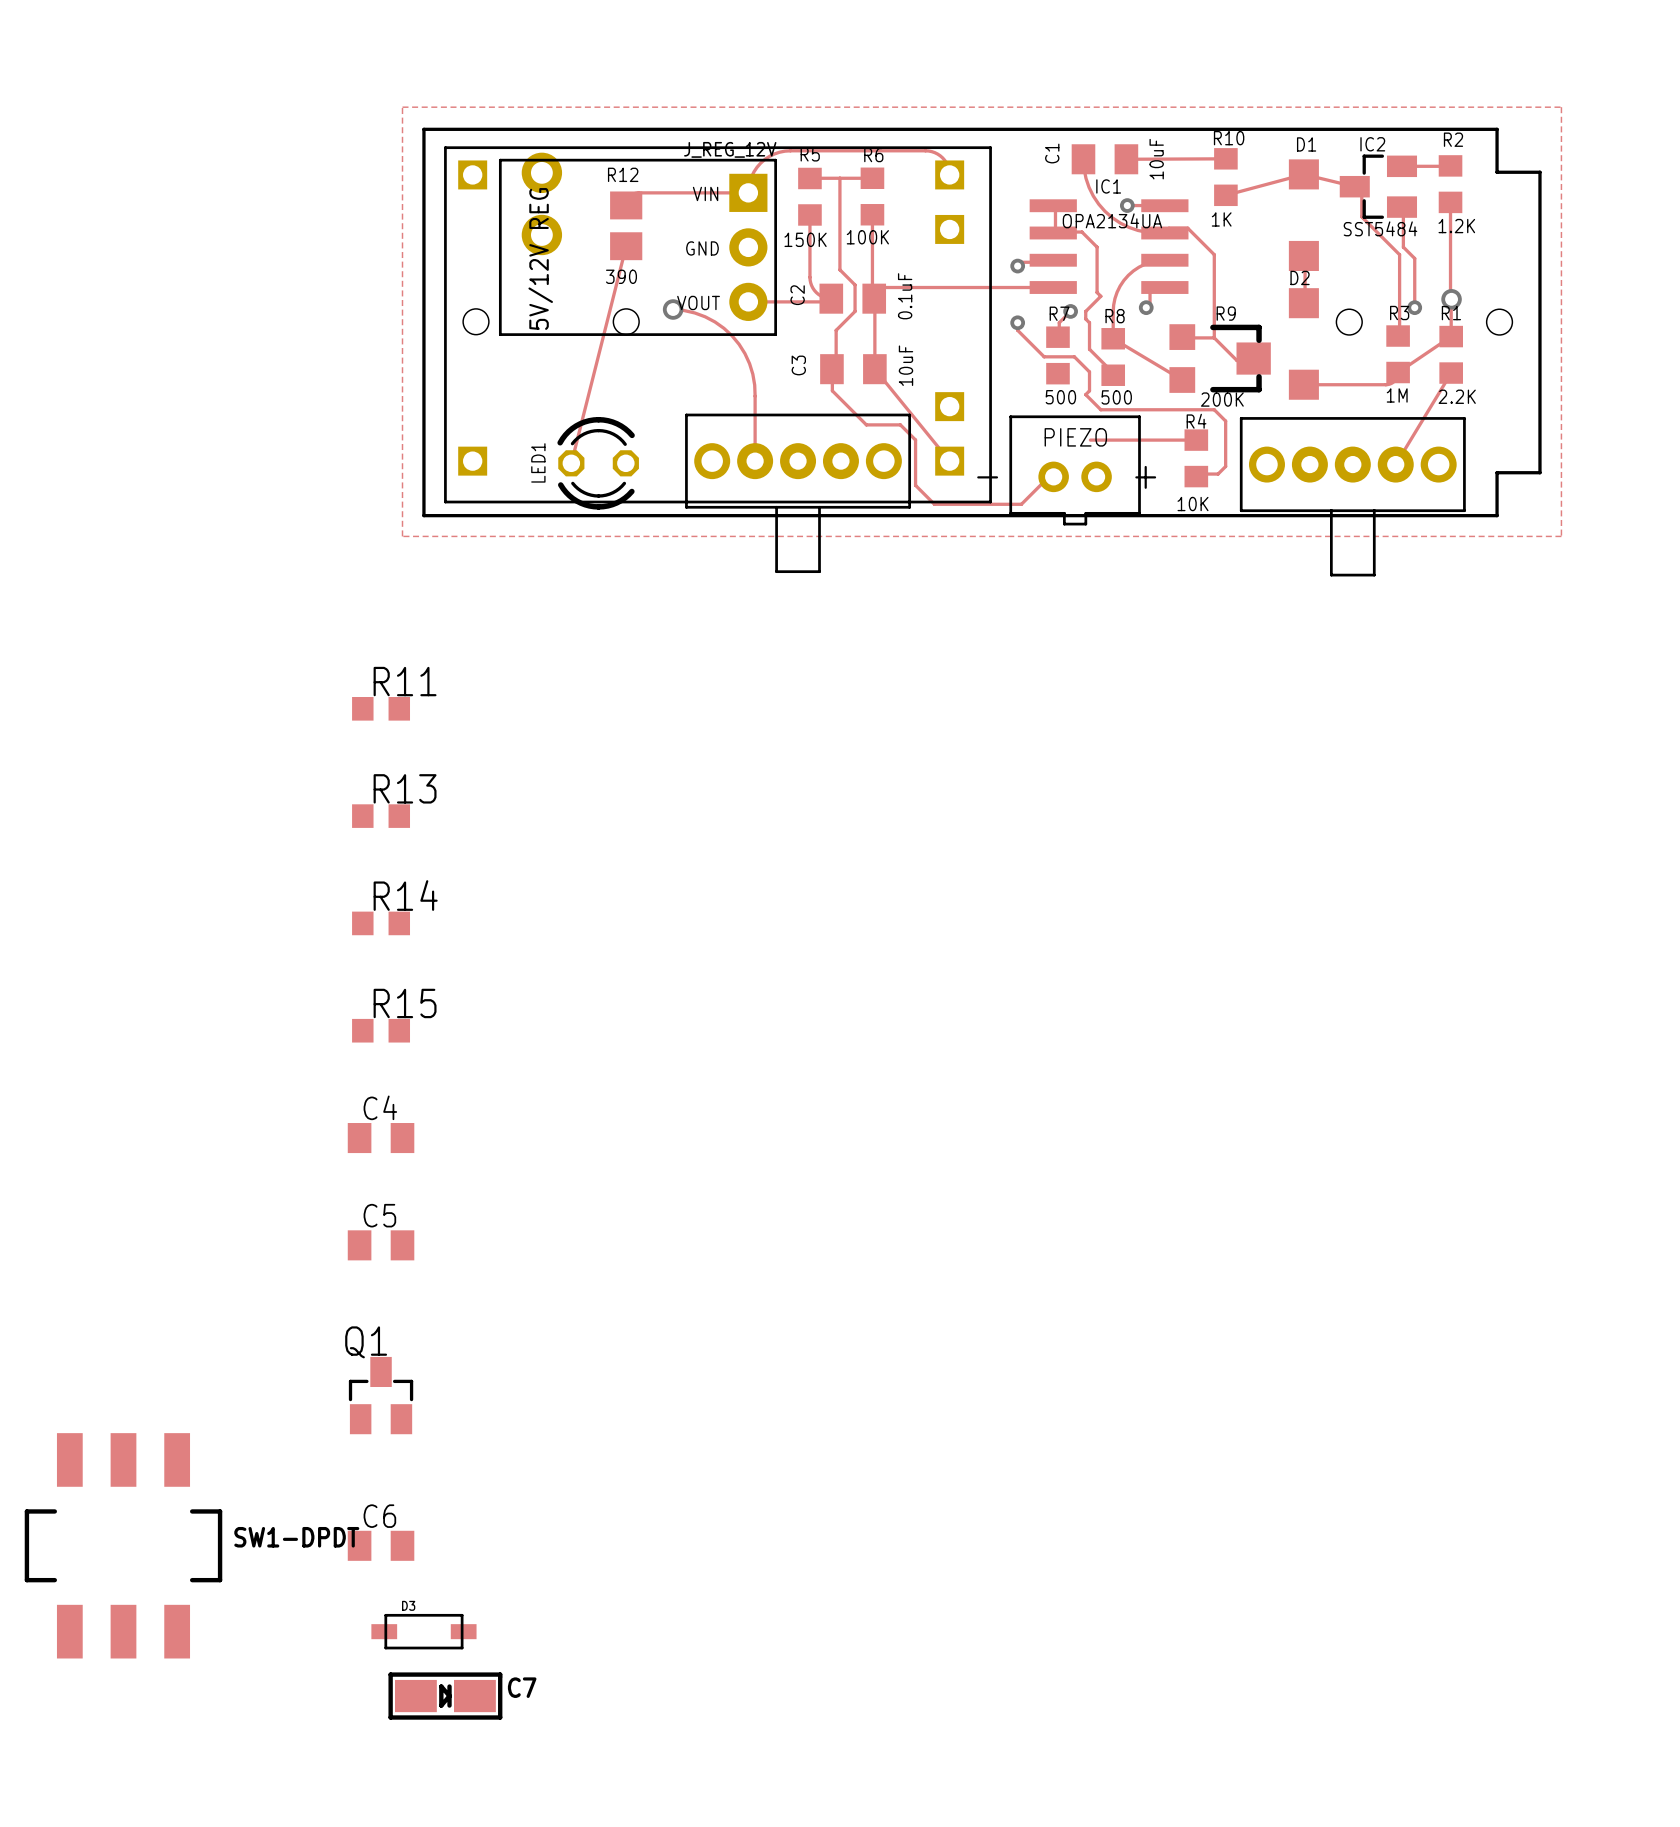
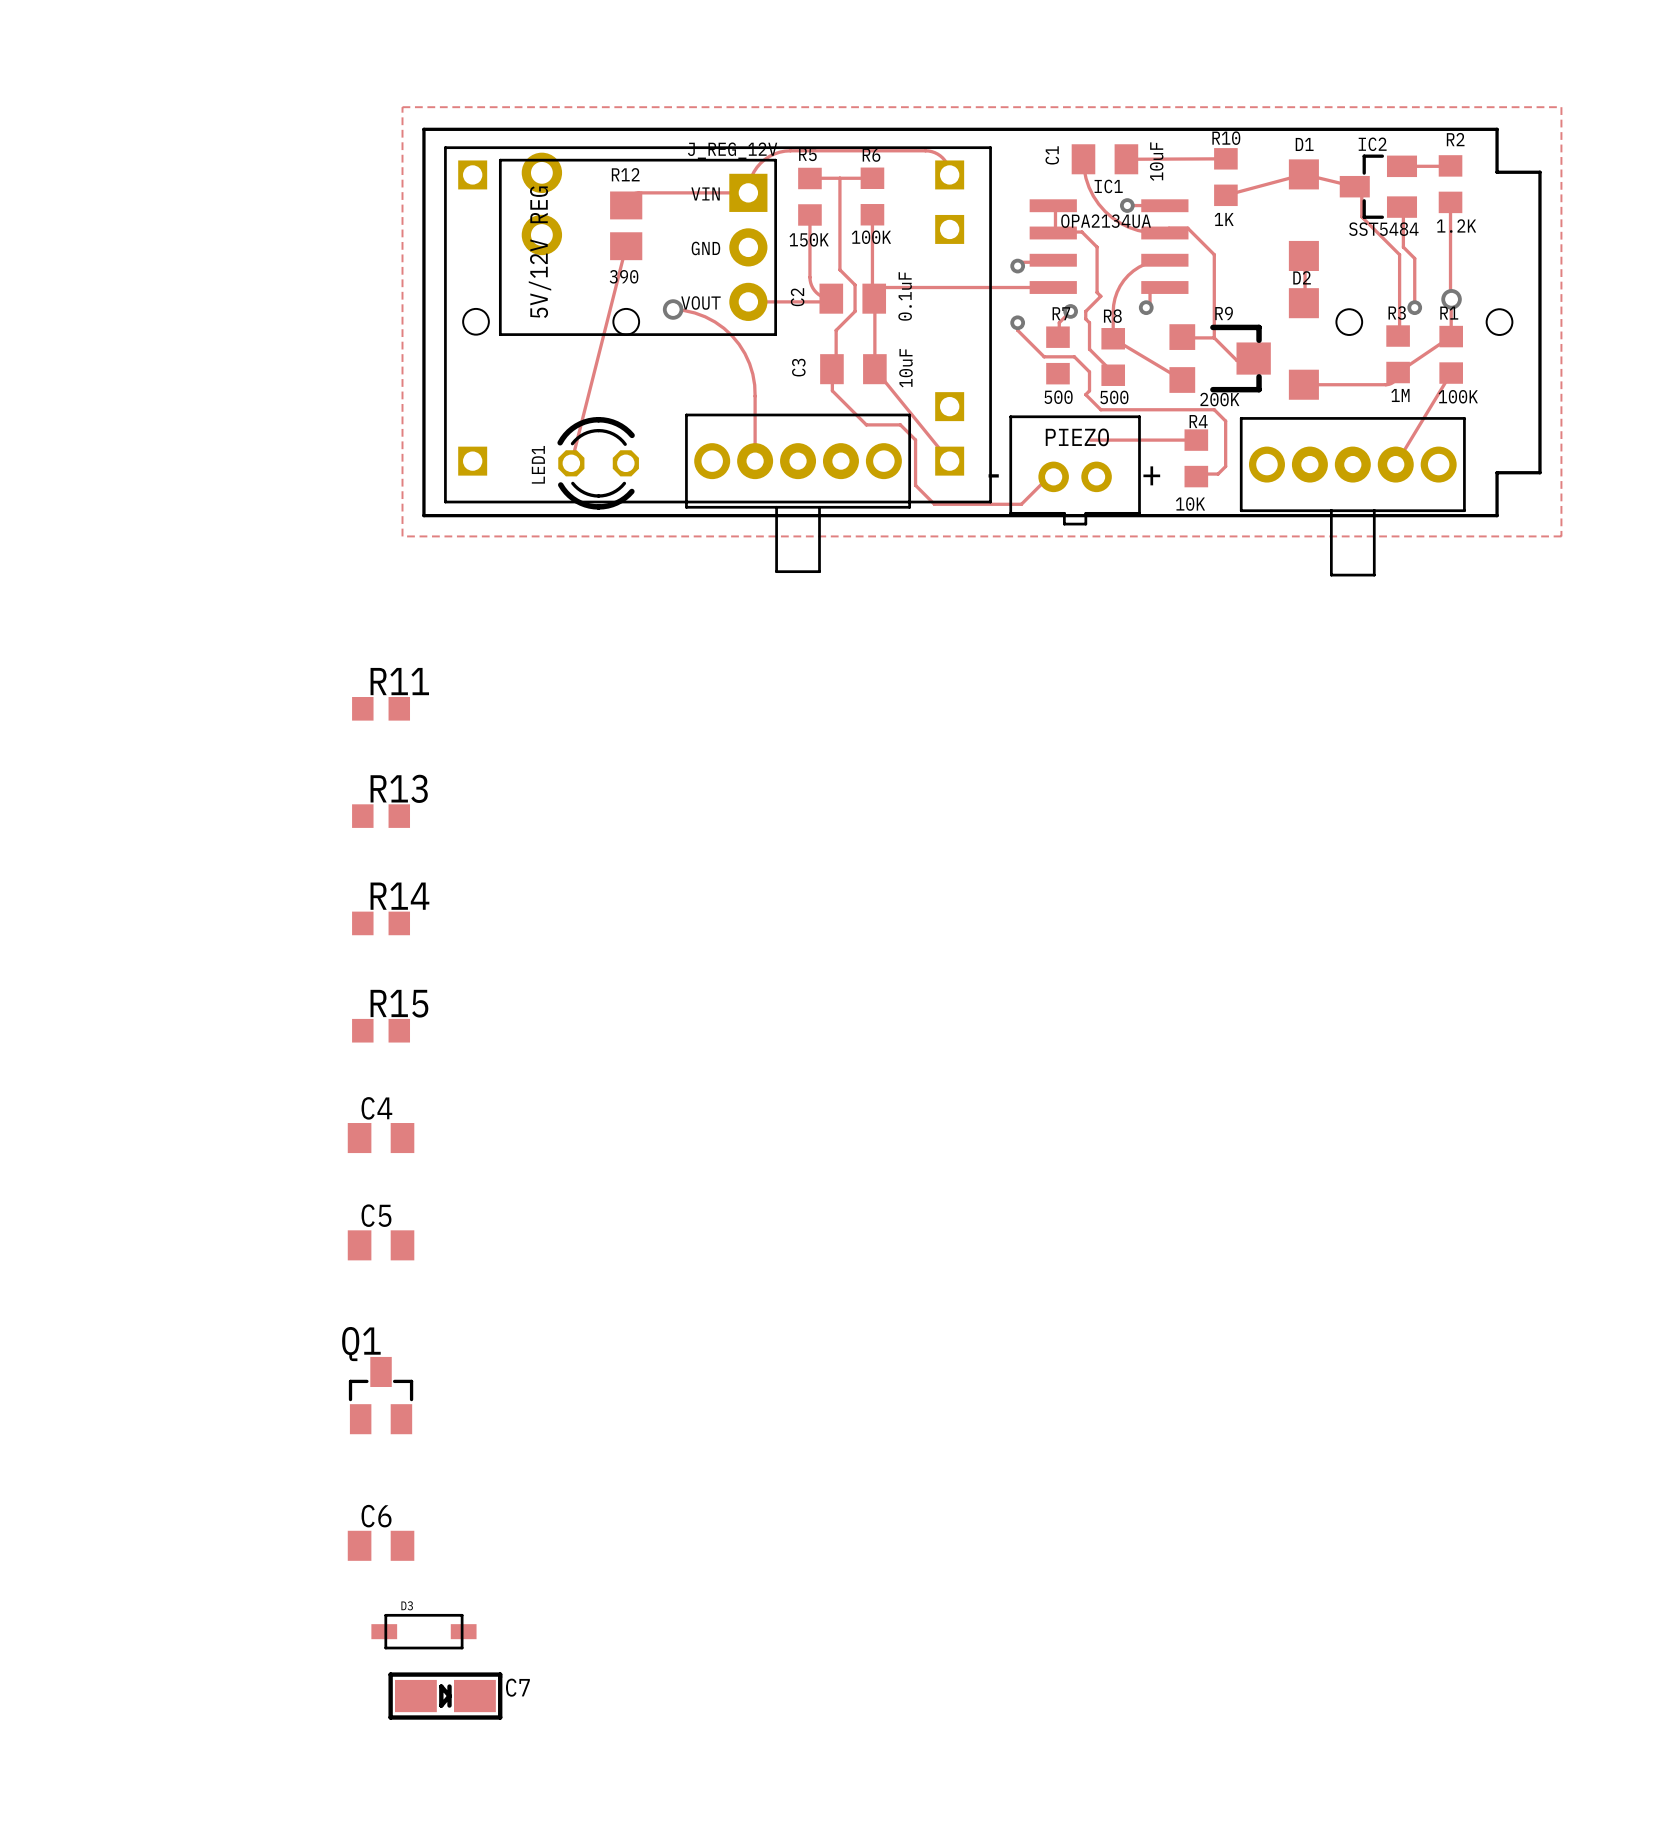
R1 value: 2.2K (1457, 396) -> 100K (1458, 396)
SW1-DPDT: (123, 1545) -> none

